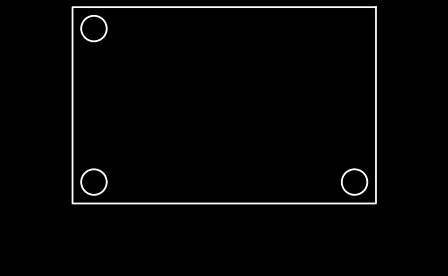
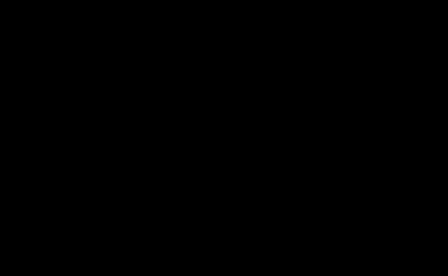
part: (224, 105) -> none

